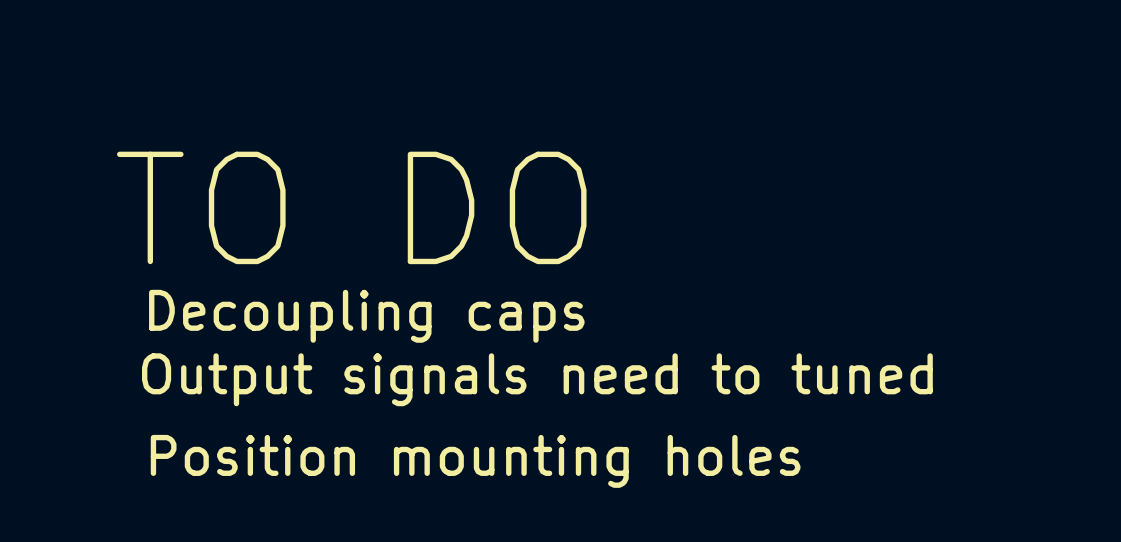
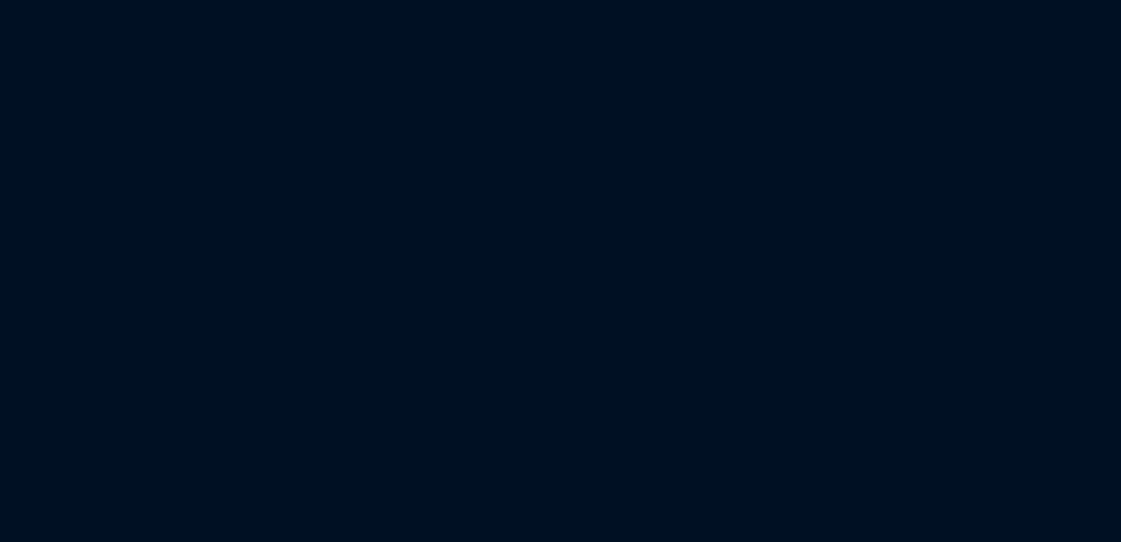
text: TO DO (351, 207) -> none
text: Decoupling caps (366, 316) -> none
text: Output signals need to tuned (537, 379) -> none
text: Position mounting holes (475, 461) -> none

